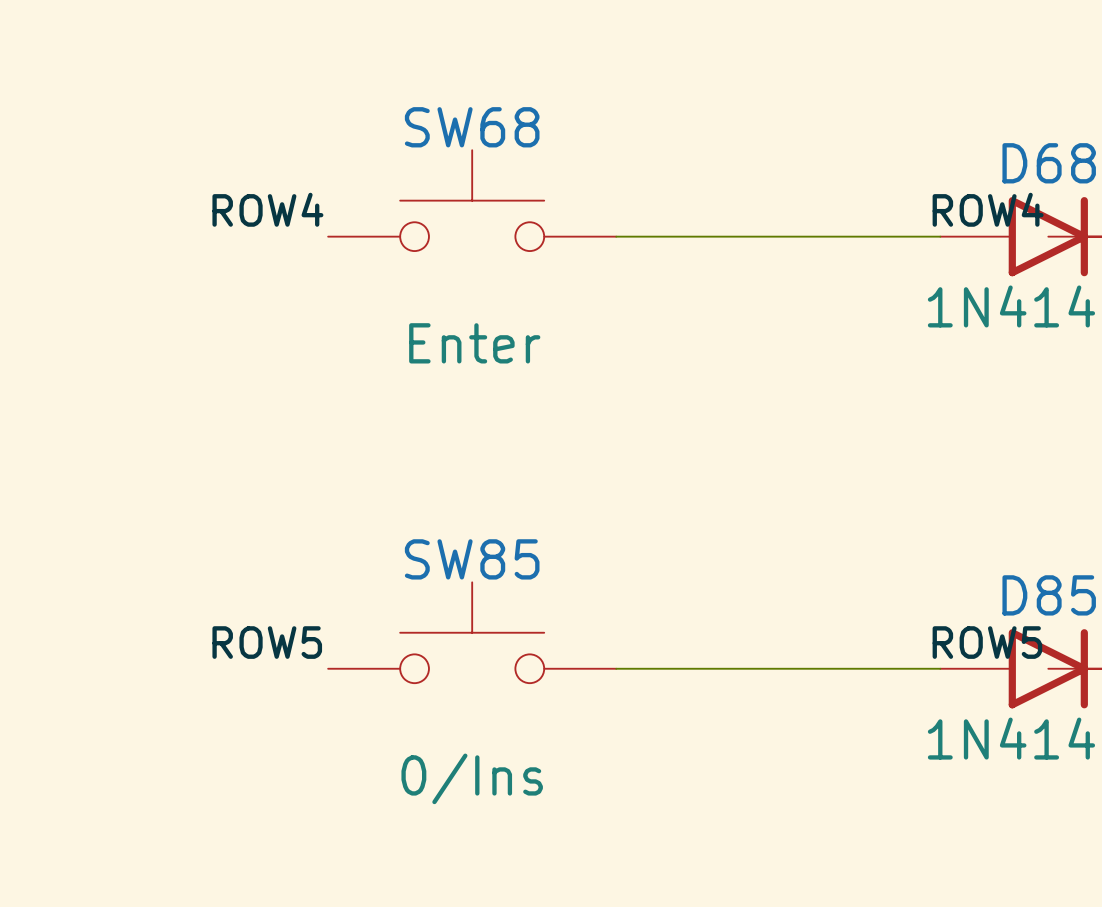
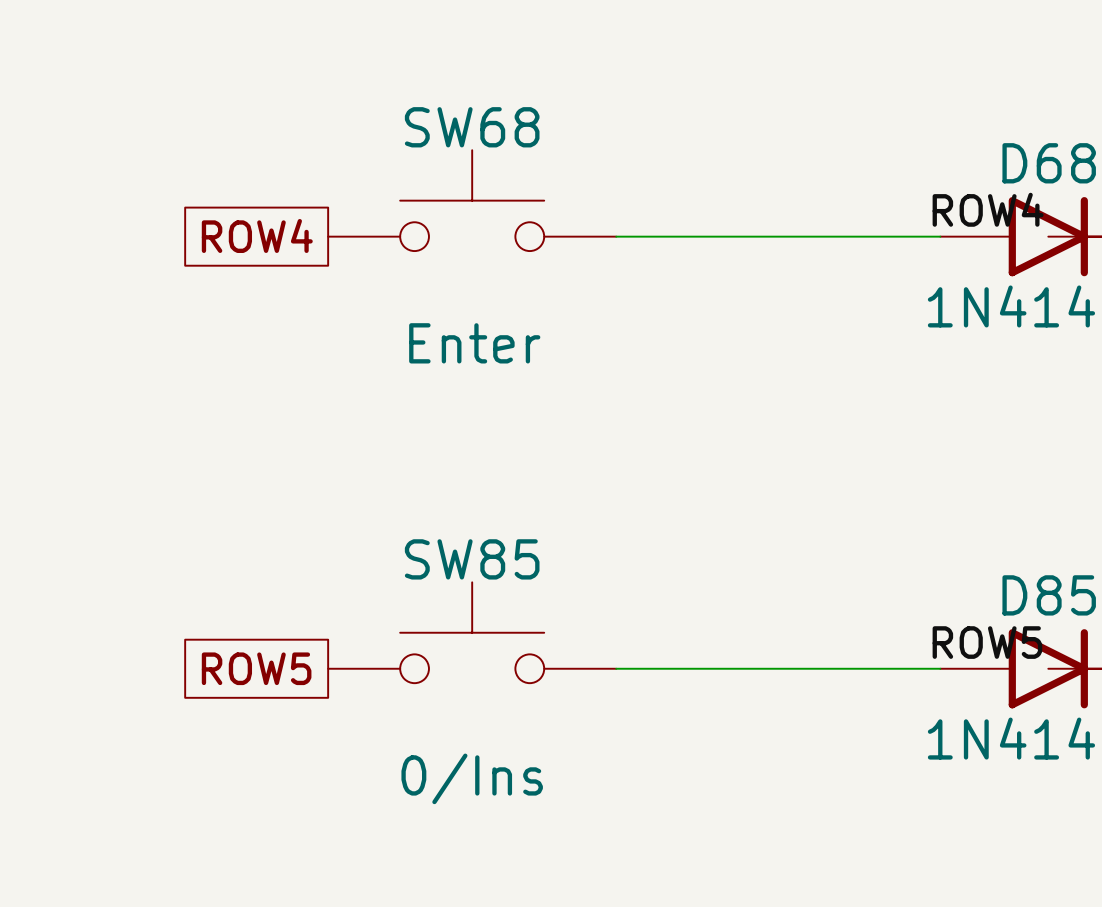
label: ROW4 (267, 209) -> none
global label: none -> ROW4 (257, 235)
label: ROW5 (267, 642) -> none
global label: none -> ROW5 (256, 668)

